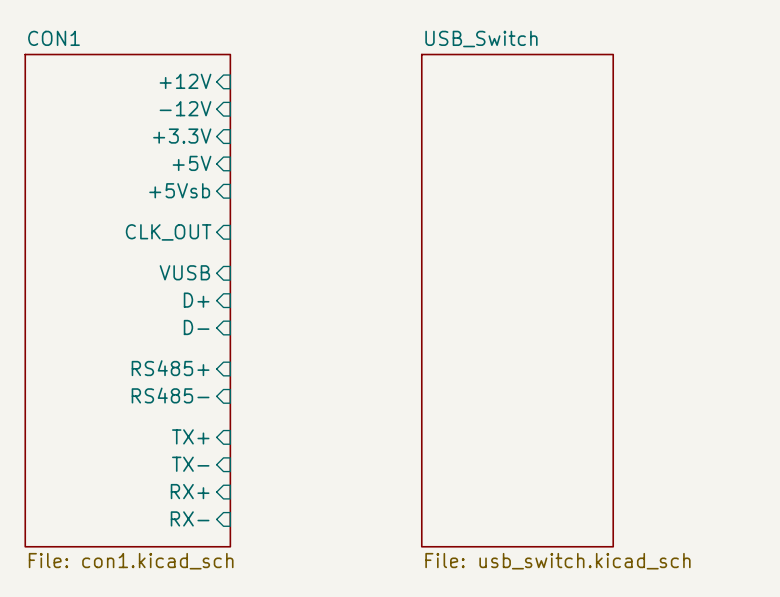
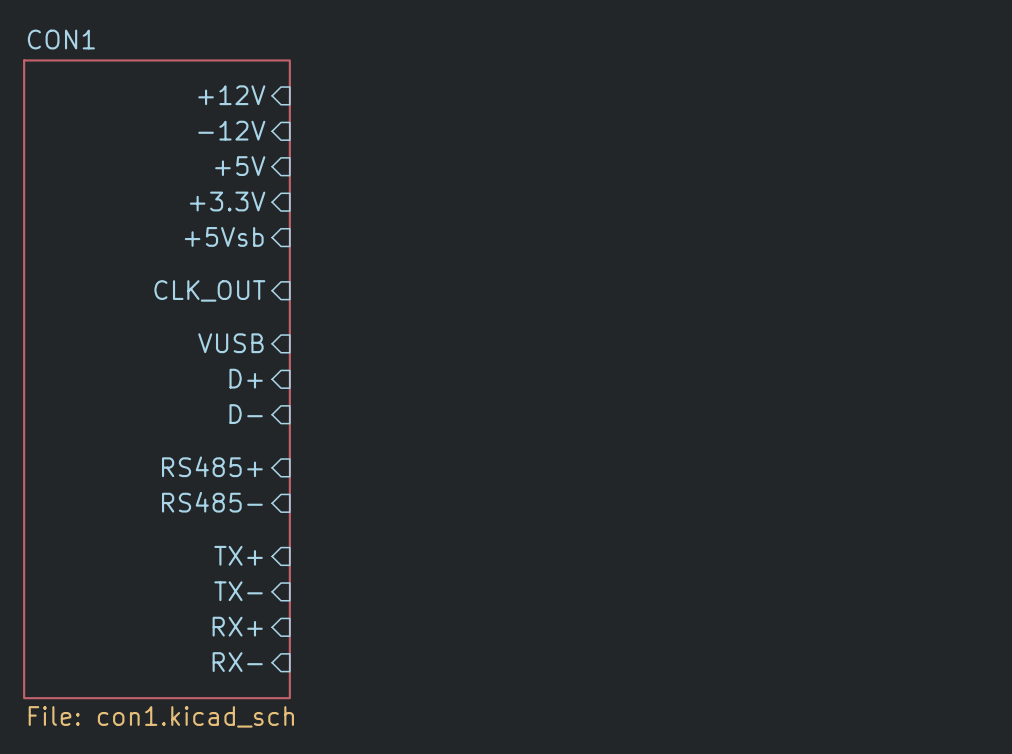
sheet pin: +3.3V (182, 136) -> +5V (240, 166)
sheet pin: +5V (192, 163) -> +3.3V (227, 201)
sheet USB_Switch: File: usb_switch.kicad_sch (517, 300) -> none

